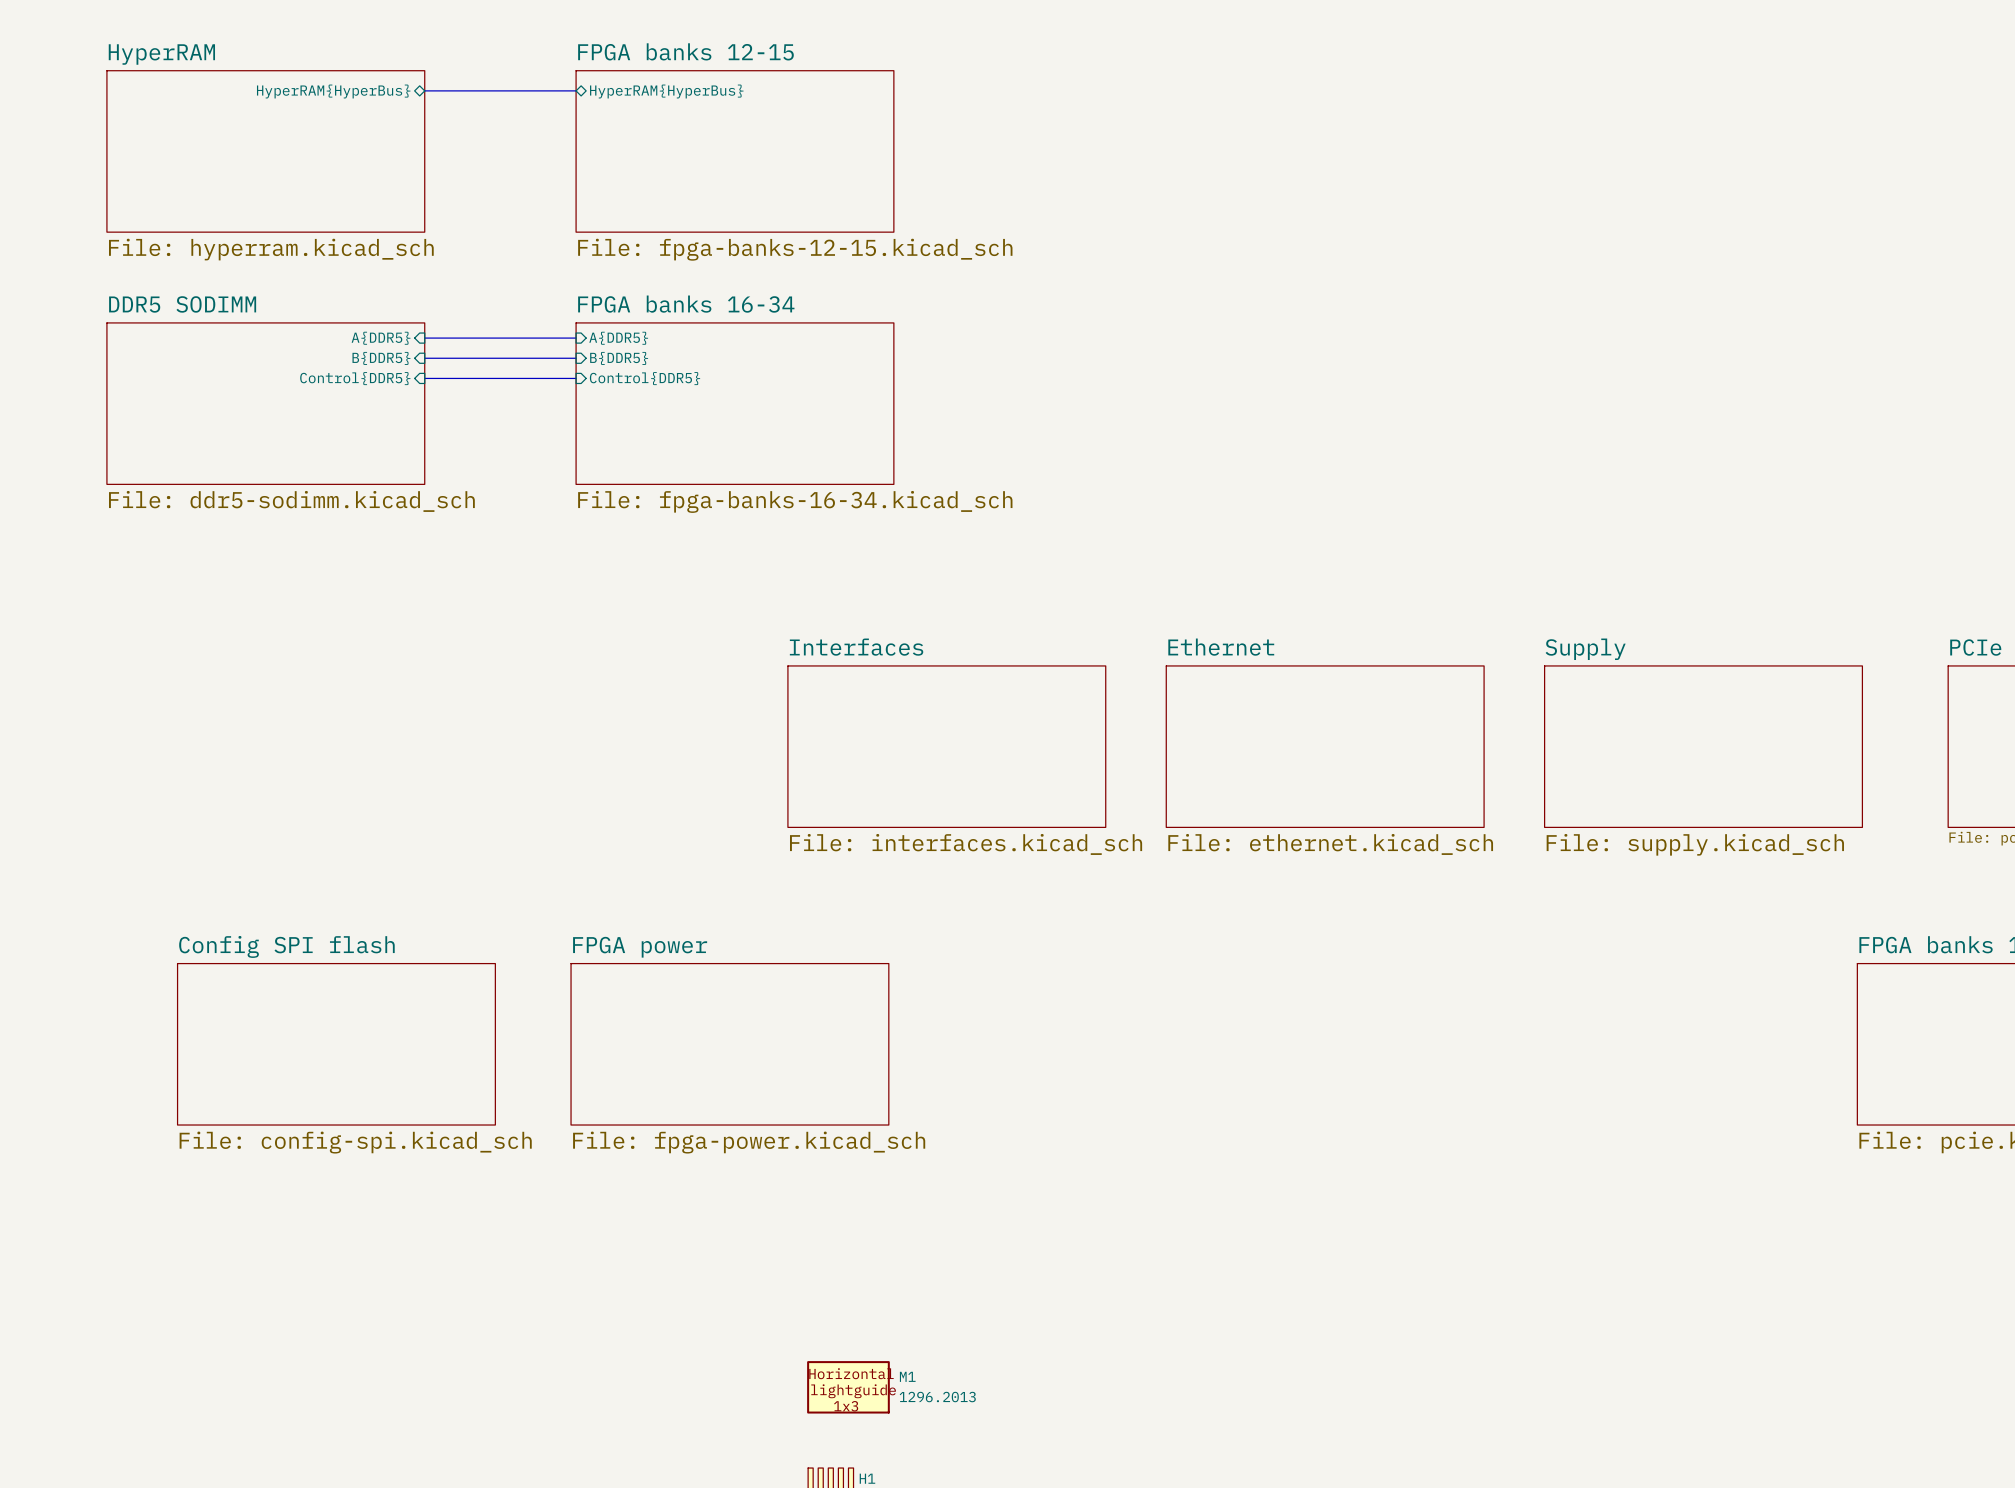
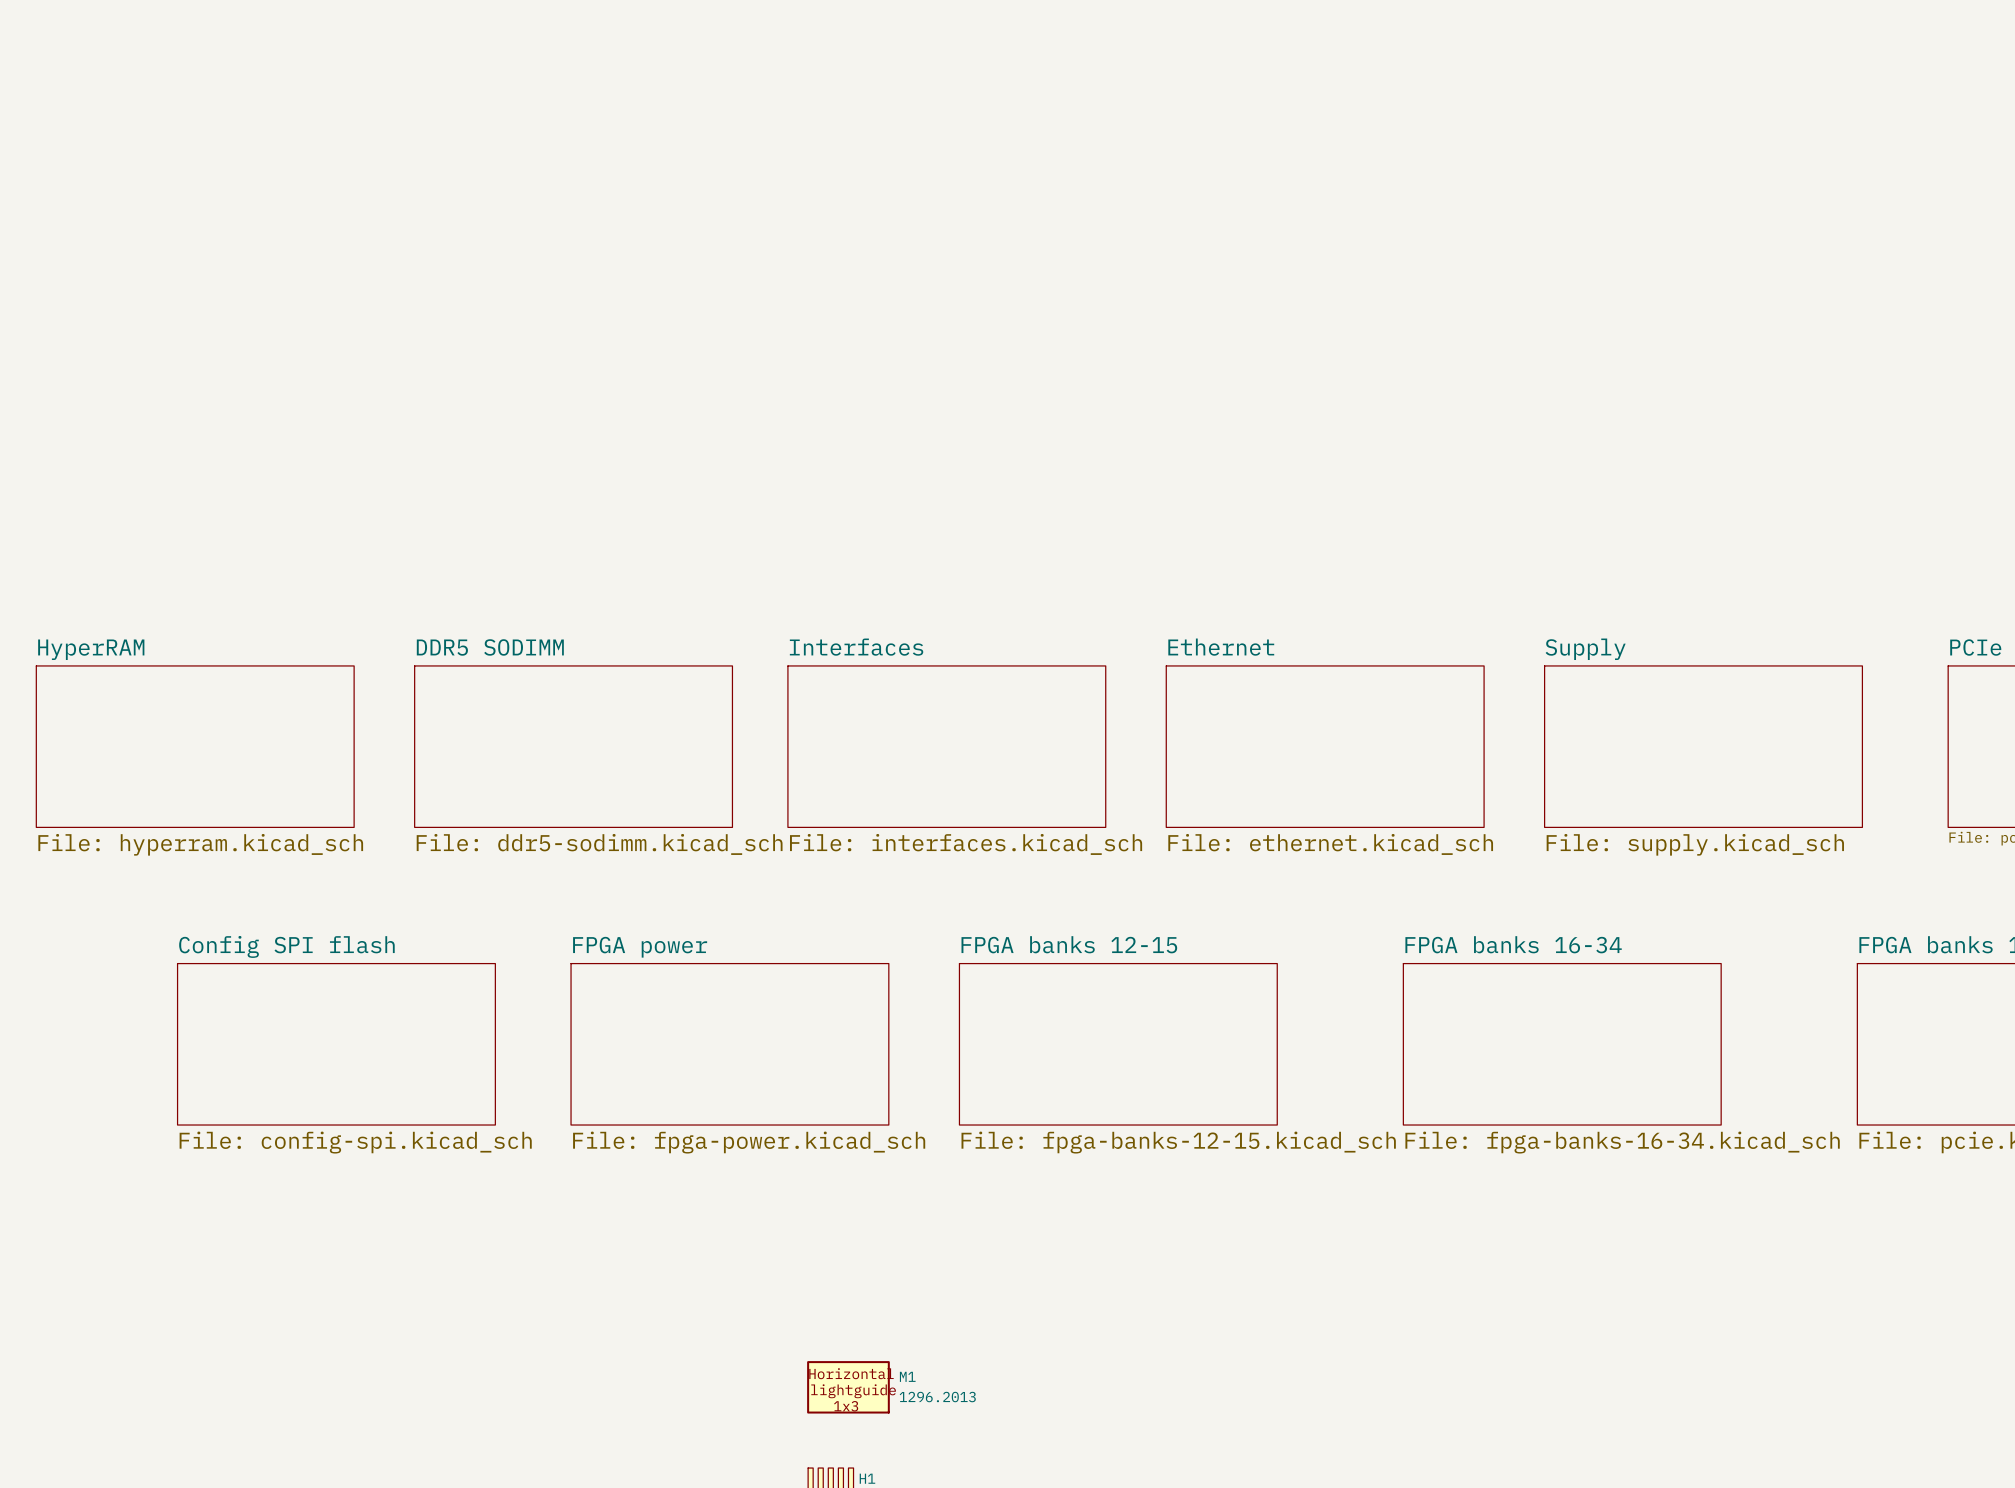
bus: (424, 90) (576, 90) -> none
sheet pin: HyperRAM{HyperBus} (333, 91) -> none
sheet pin: HyperRAM{HyperBus} (666, 91) -> none
sheet HyperRAM: File: hyperram.kicad_sch (265, 151) -> none
sheet FPGA banks 12-15 position: (734, 151) -> (1118, 1044)
sheet pin: A{DDR5} (381, 338) -> none
bus: (424, 338) (576, 338) -> none
sheet pin: A{DDR5} (618, 338) -> none
sheet pin: B{DDR5} (381, 358) -> none
bus: (424, 358) (576, 358) -> none
sheet pin: B{DDR5} (619, 358) -> none
sheet pin: Control{DDR5} (355, 378) -> none
bus: (424, 378) (576, 378) -> none
sheet pin: Control{DDR5} (645, 378) -> none
sheet DDR5 SODIMM position: (265, 403) -> (573, 746)
sheet FPGA banks 16-34 position: (734, 403) -> (1562, 1044)
sheet HyperRAM: none -> File: hyperram.kicad_sch (195, 746)

